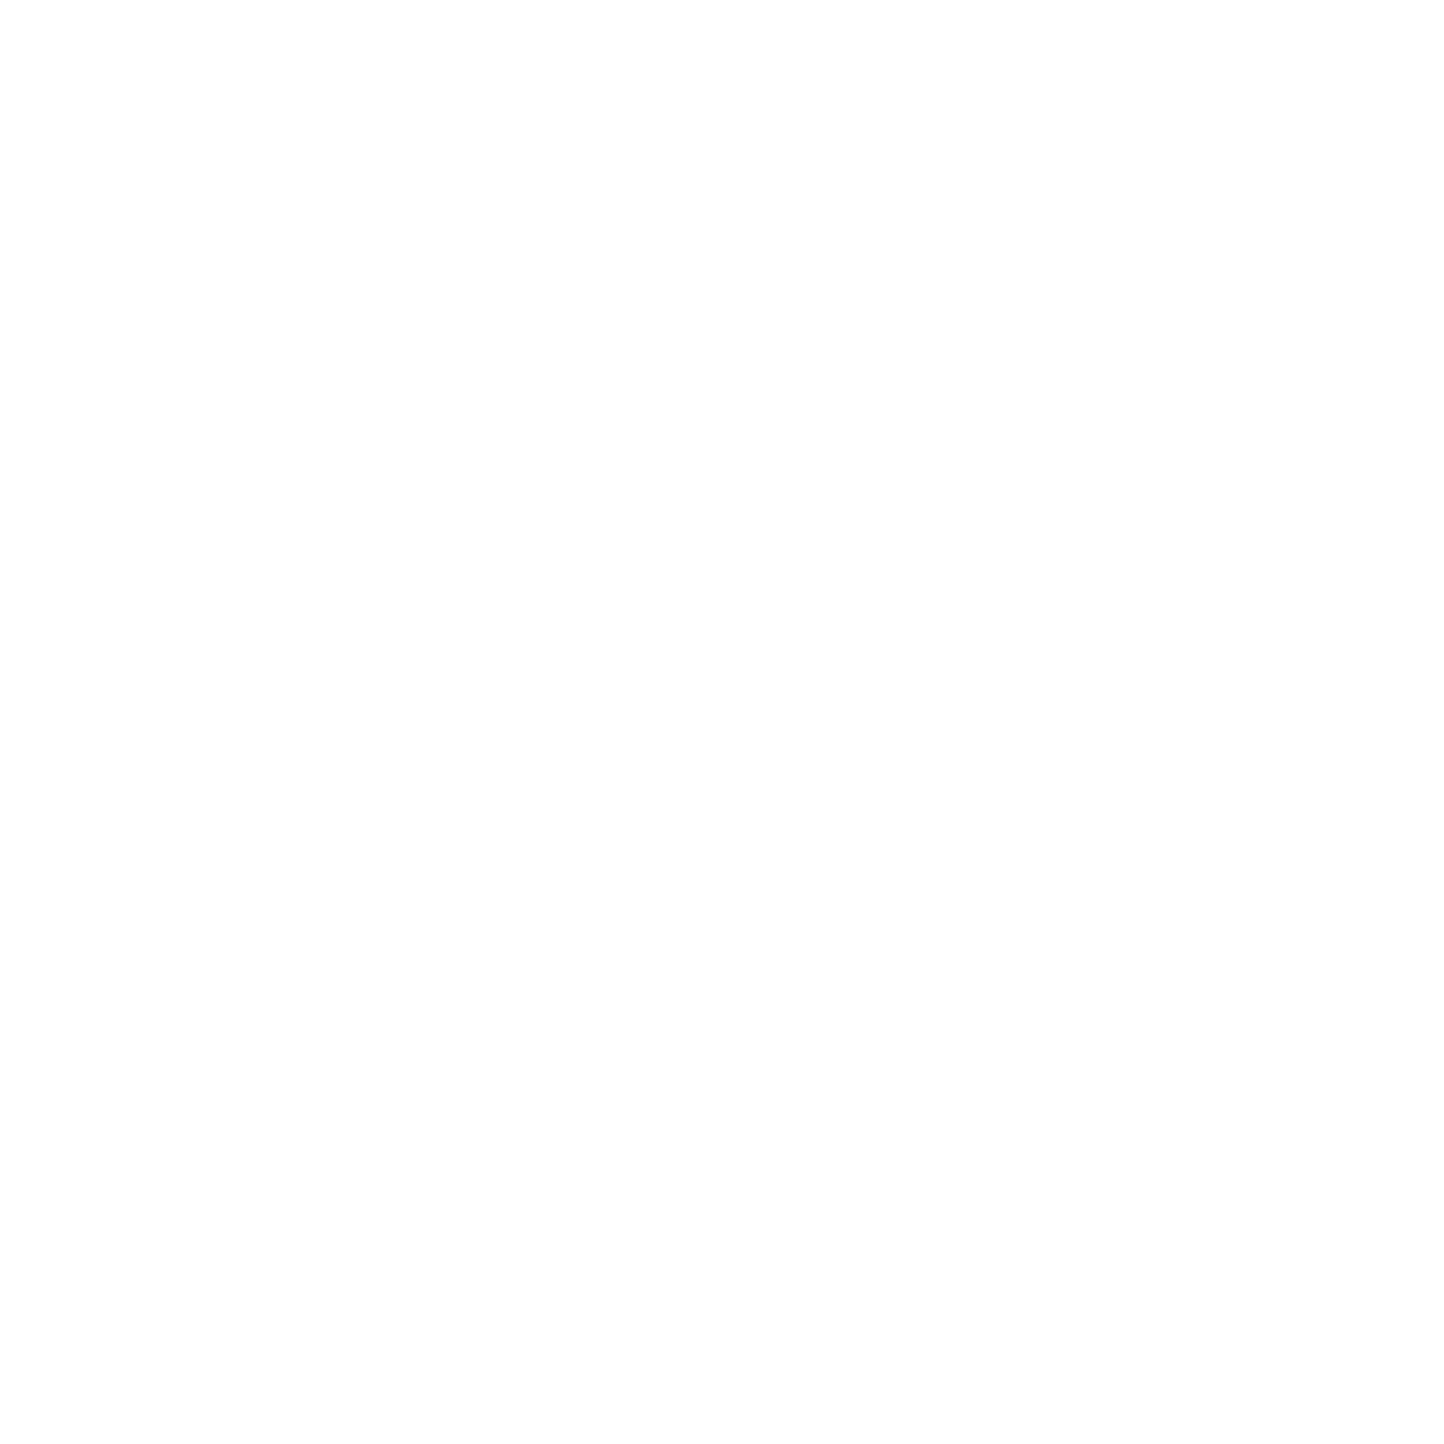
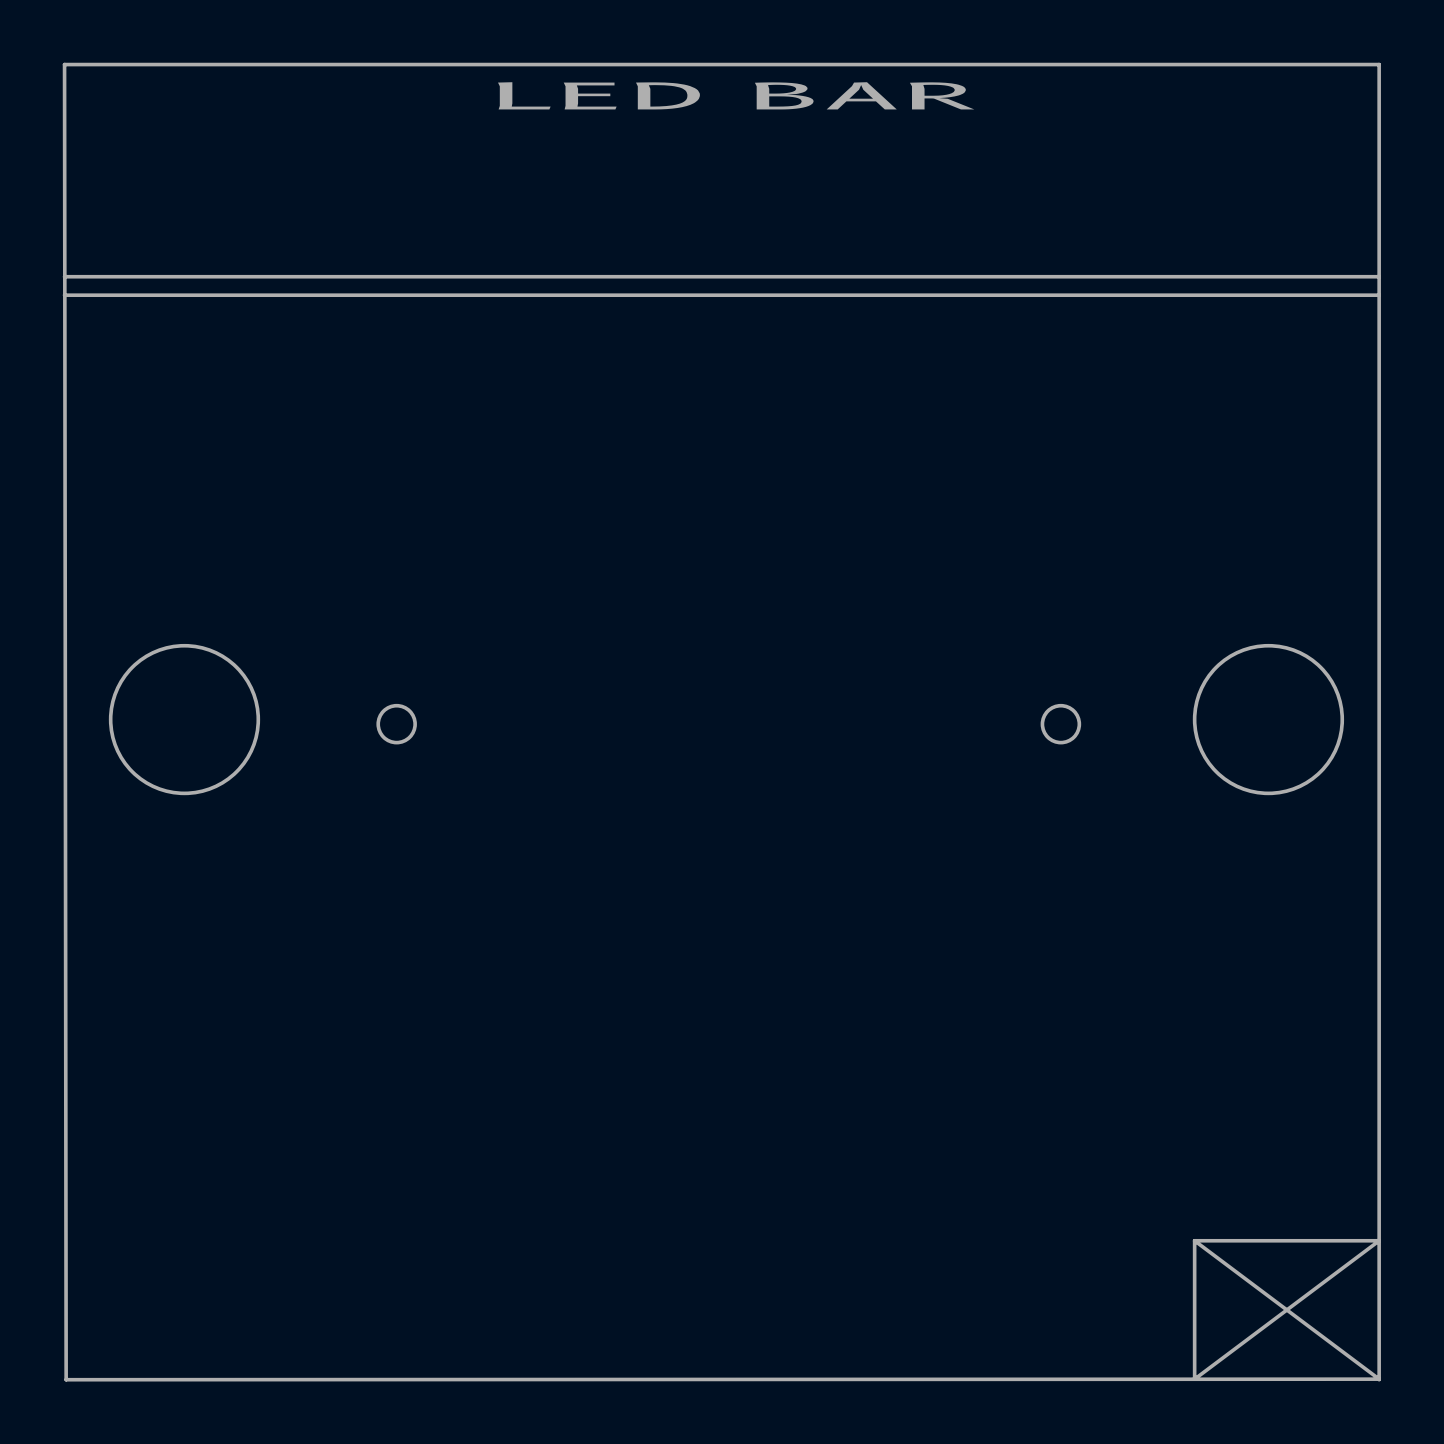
text: none -> LED BAR (736, 95)
line: none -> (64, 276) (1379, 276)
line: none -> (64, 295) (1379, 295)
drawing: none -> [108, 643, 261, 796]
drawing: none -> [1192, 643, 1345, 796]
drawing: none -> [376, 703, 417, 745]
drawing: none -> [1040, 703, 1082, 745]
line: none -> (1194, 1240) (1379, 1379) (66, 1379) (64, 64) (1379, 64) (1379, 1379)
line: none -> (1194, 1240) (1194, 1379) (1379, 1240) (1194, 1240)

